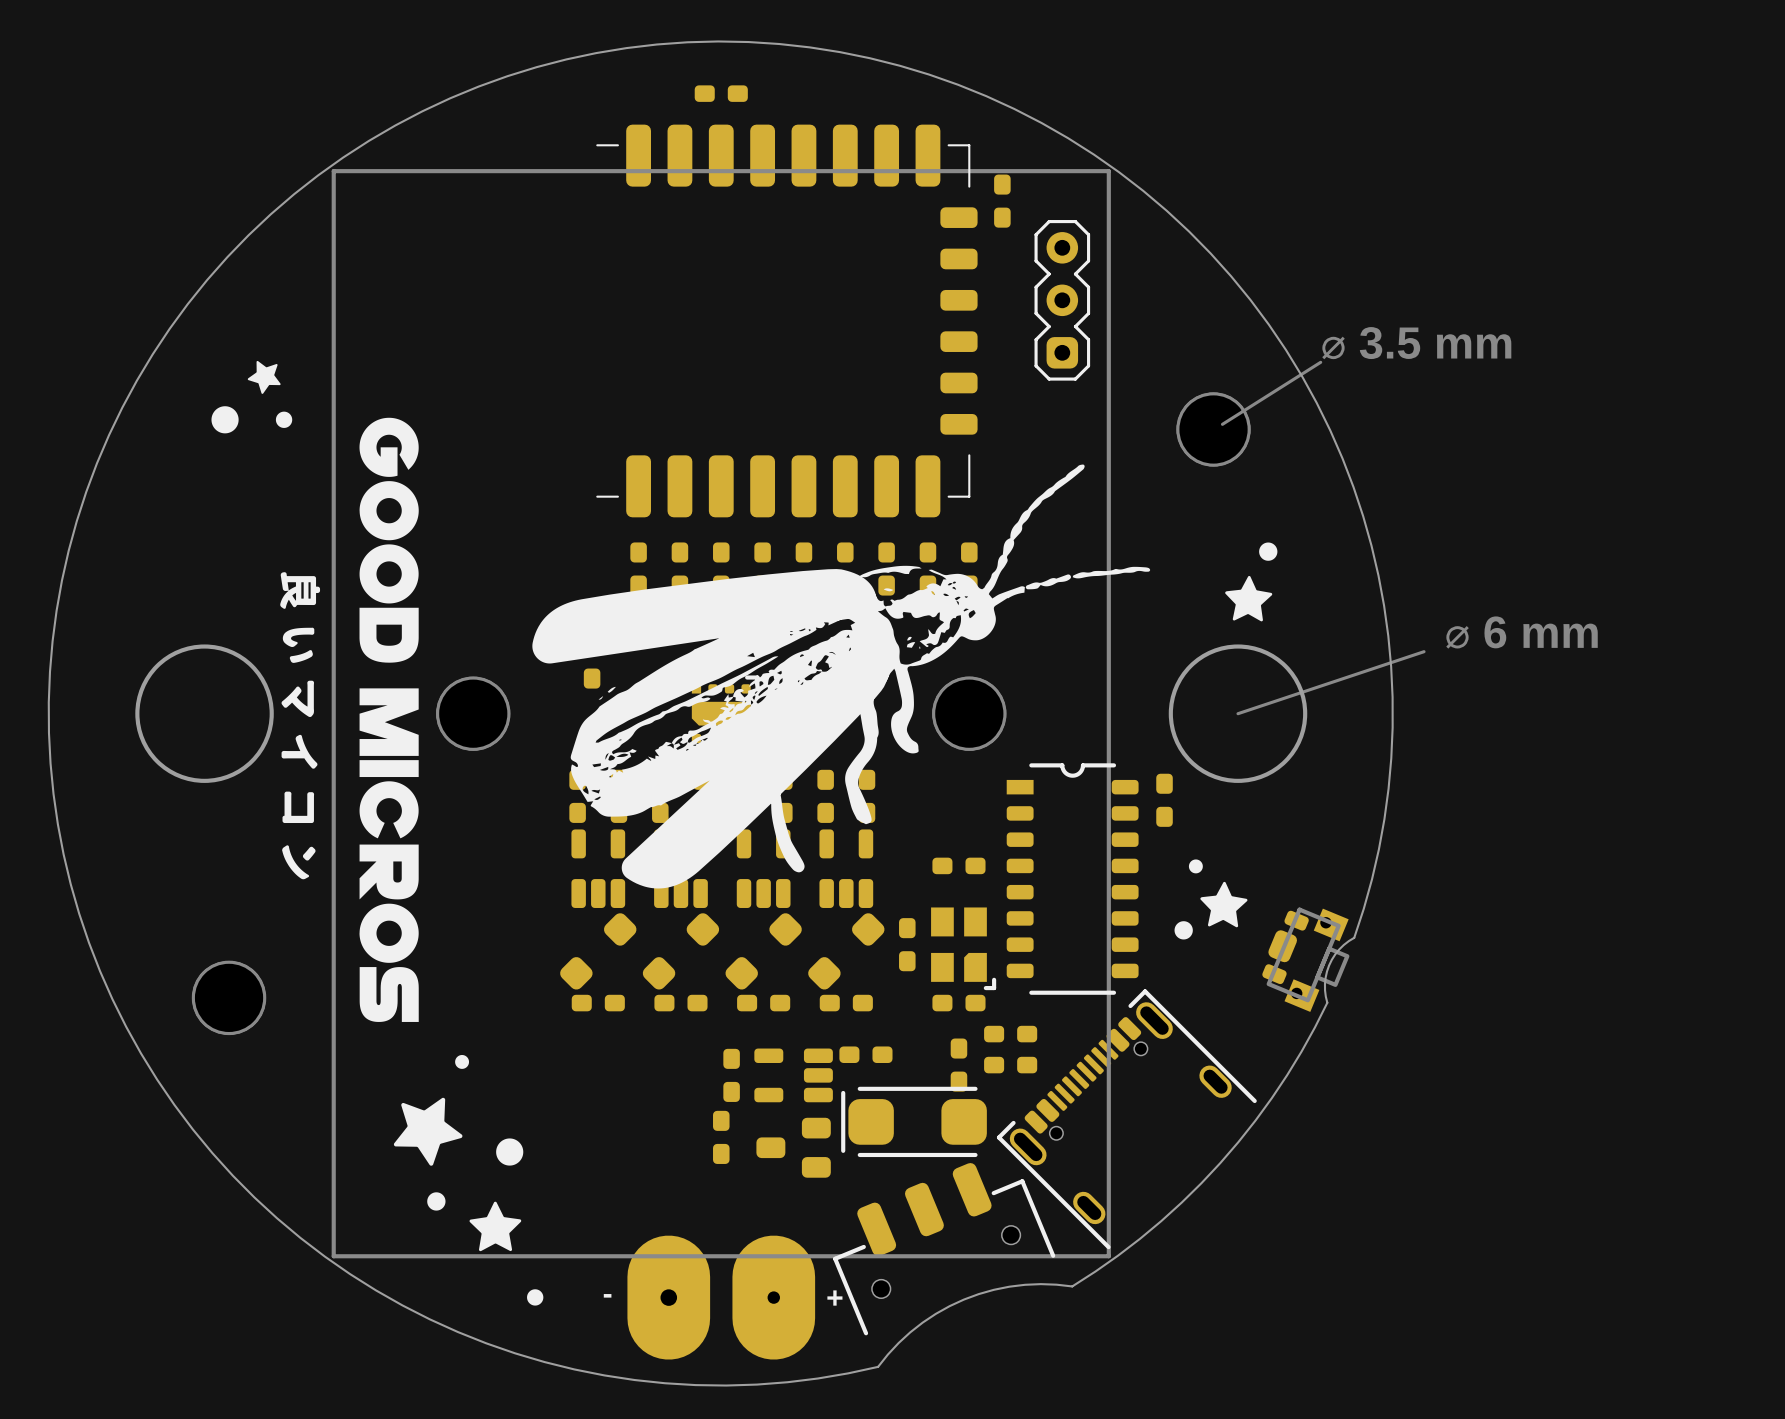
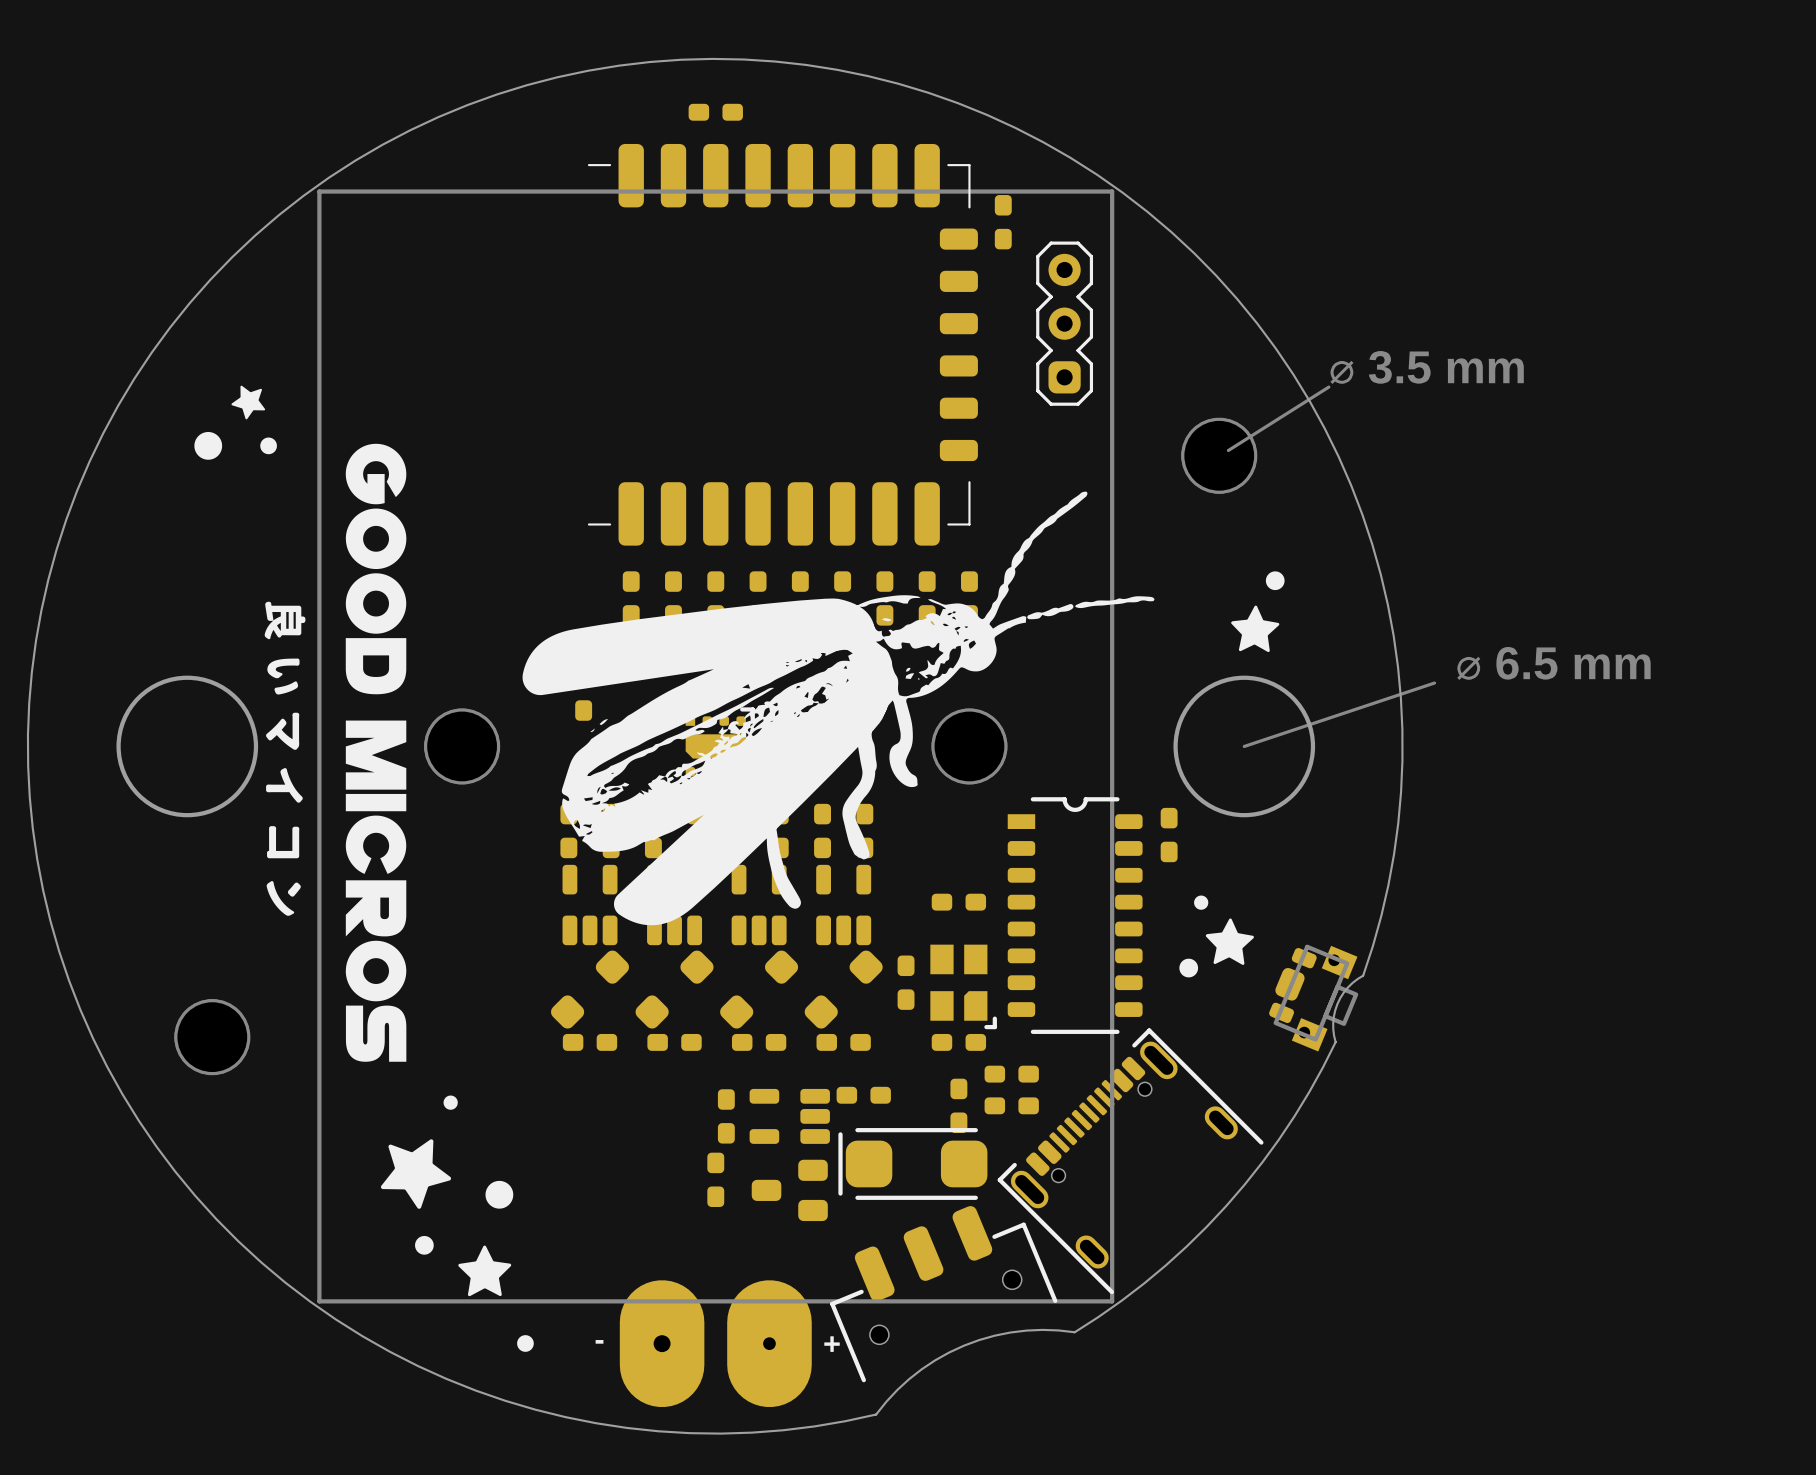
text: ⌀ 6 mm (1521, 632) -> ⌀ 6.5 mm (1553, 663)

